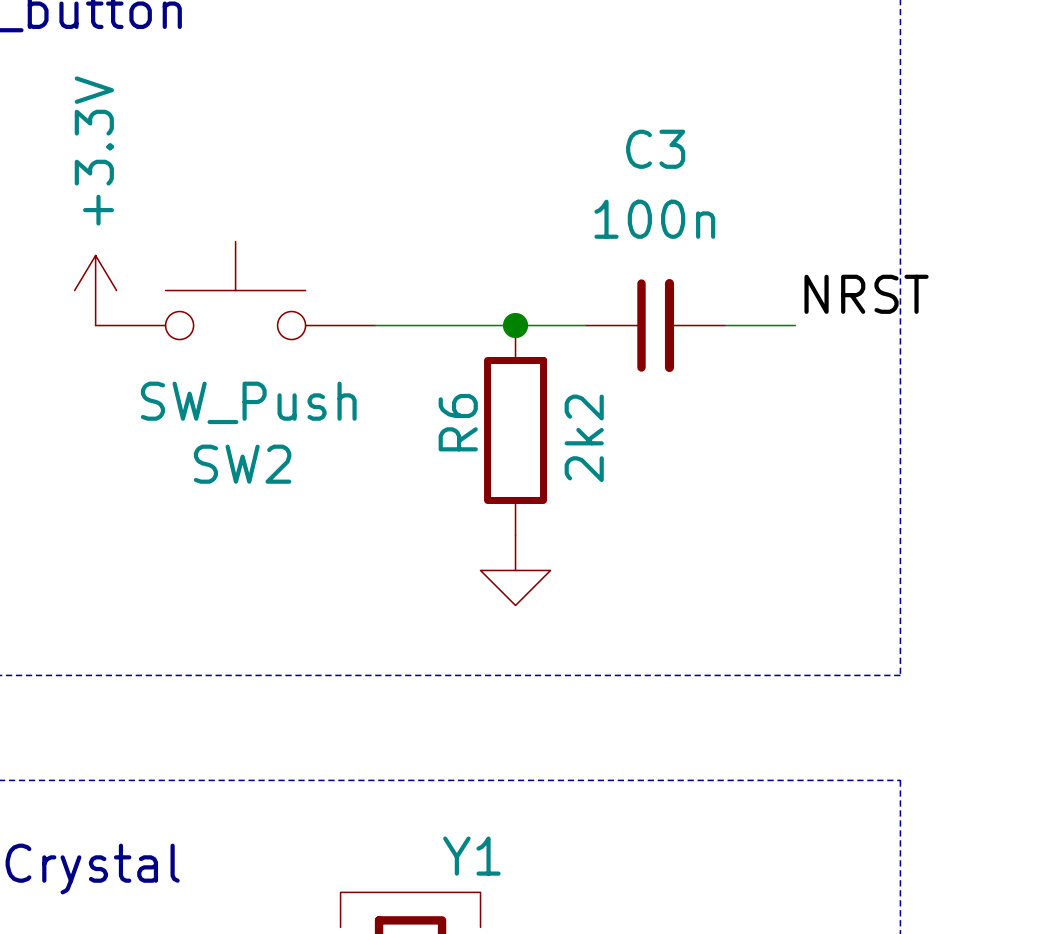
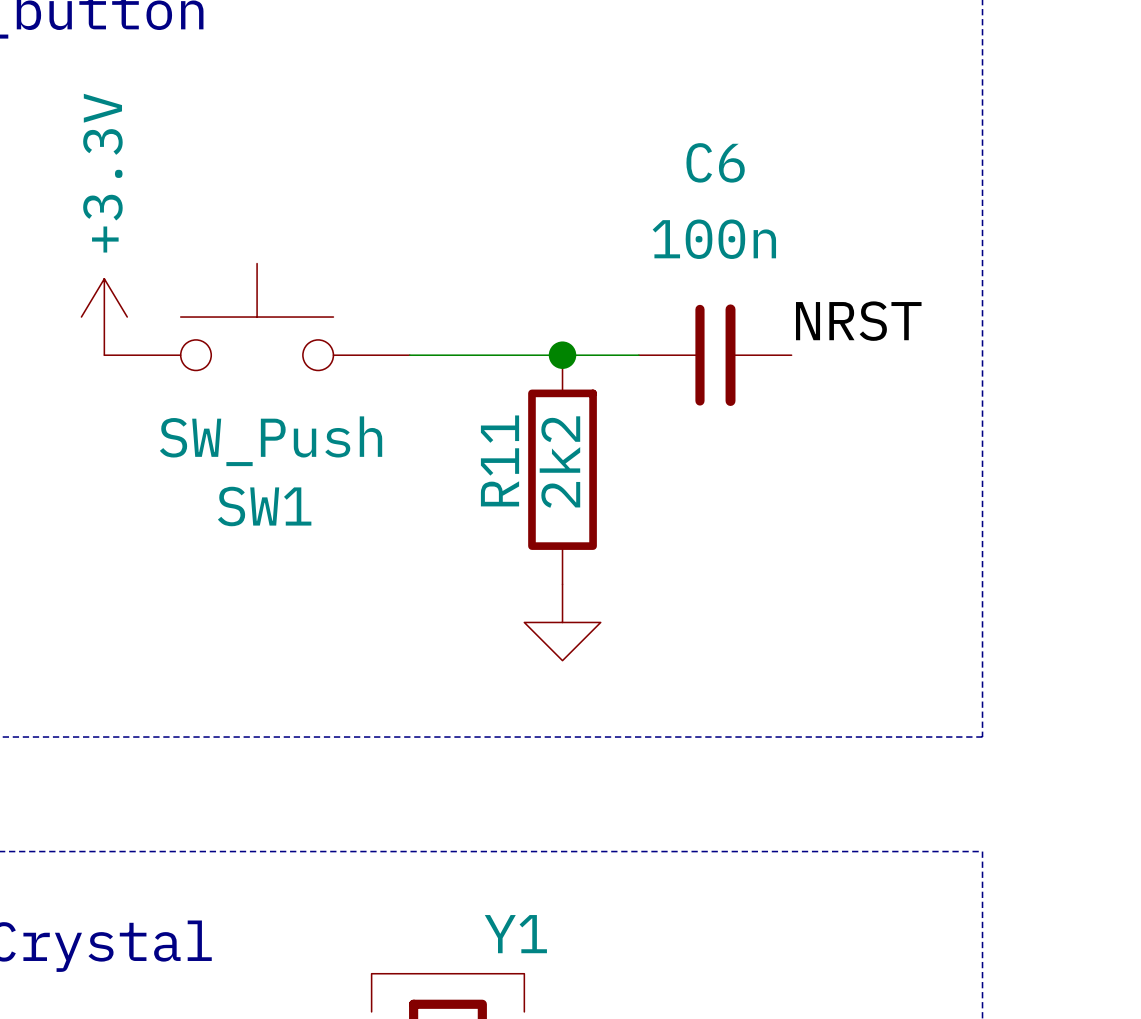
C3 name: C3 (655, 149) -> C6 (715, 162)
label position: NRST (866, 294) -> NRST (858, 321)
wire: (725, 325) (795, 325) -> none
R6 name: R6 (458, 422) -> R11 (500, 460)
R6 value position: 2k2 (584, 438) -> 2k2 (559, 462)
SW2 name: SW2 (242, 464) -> SW1 (264, 506)

